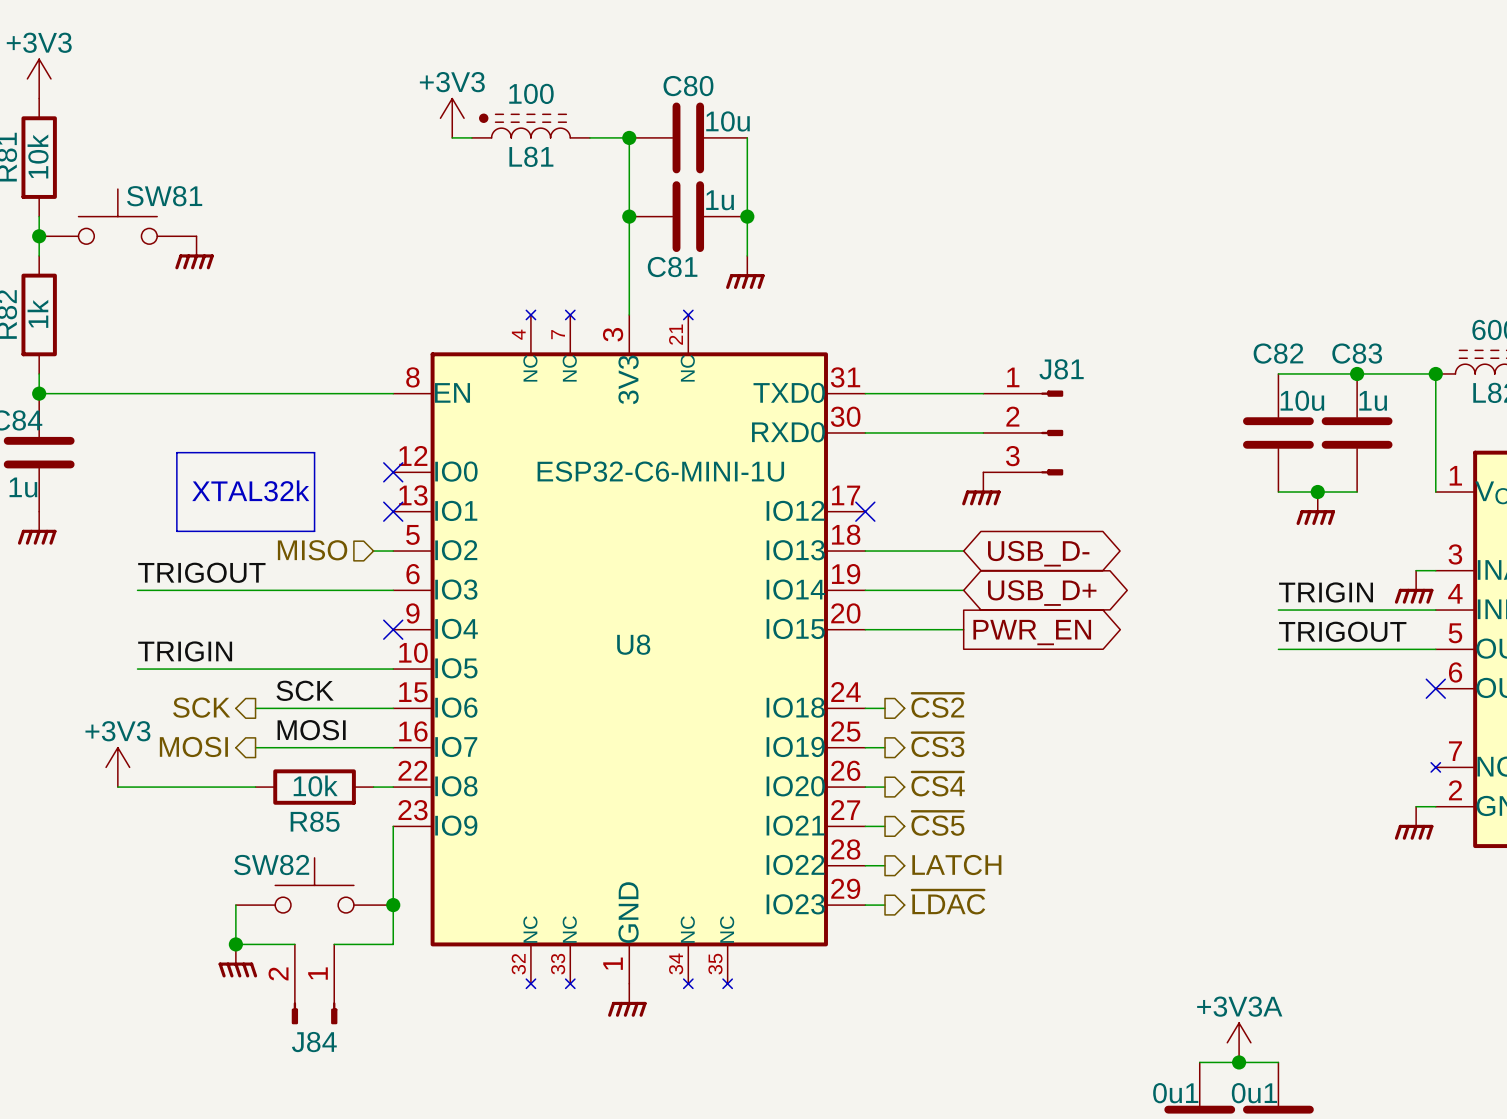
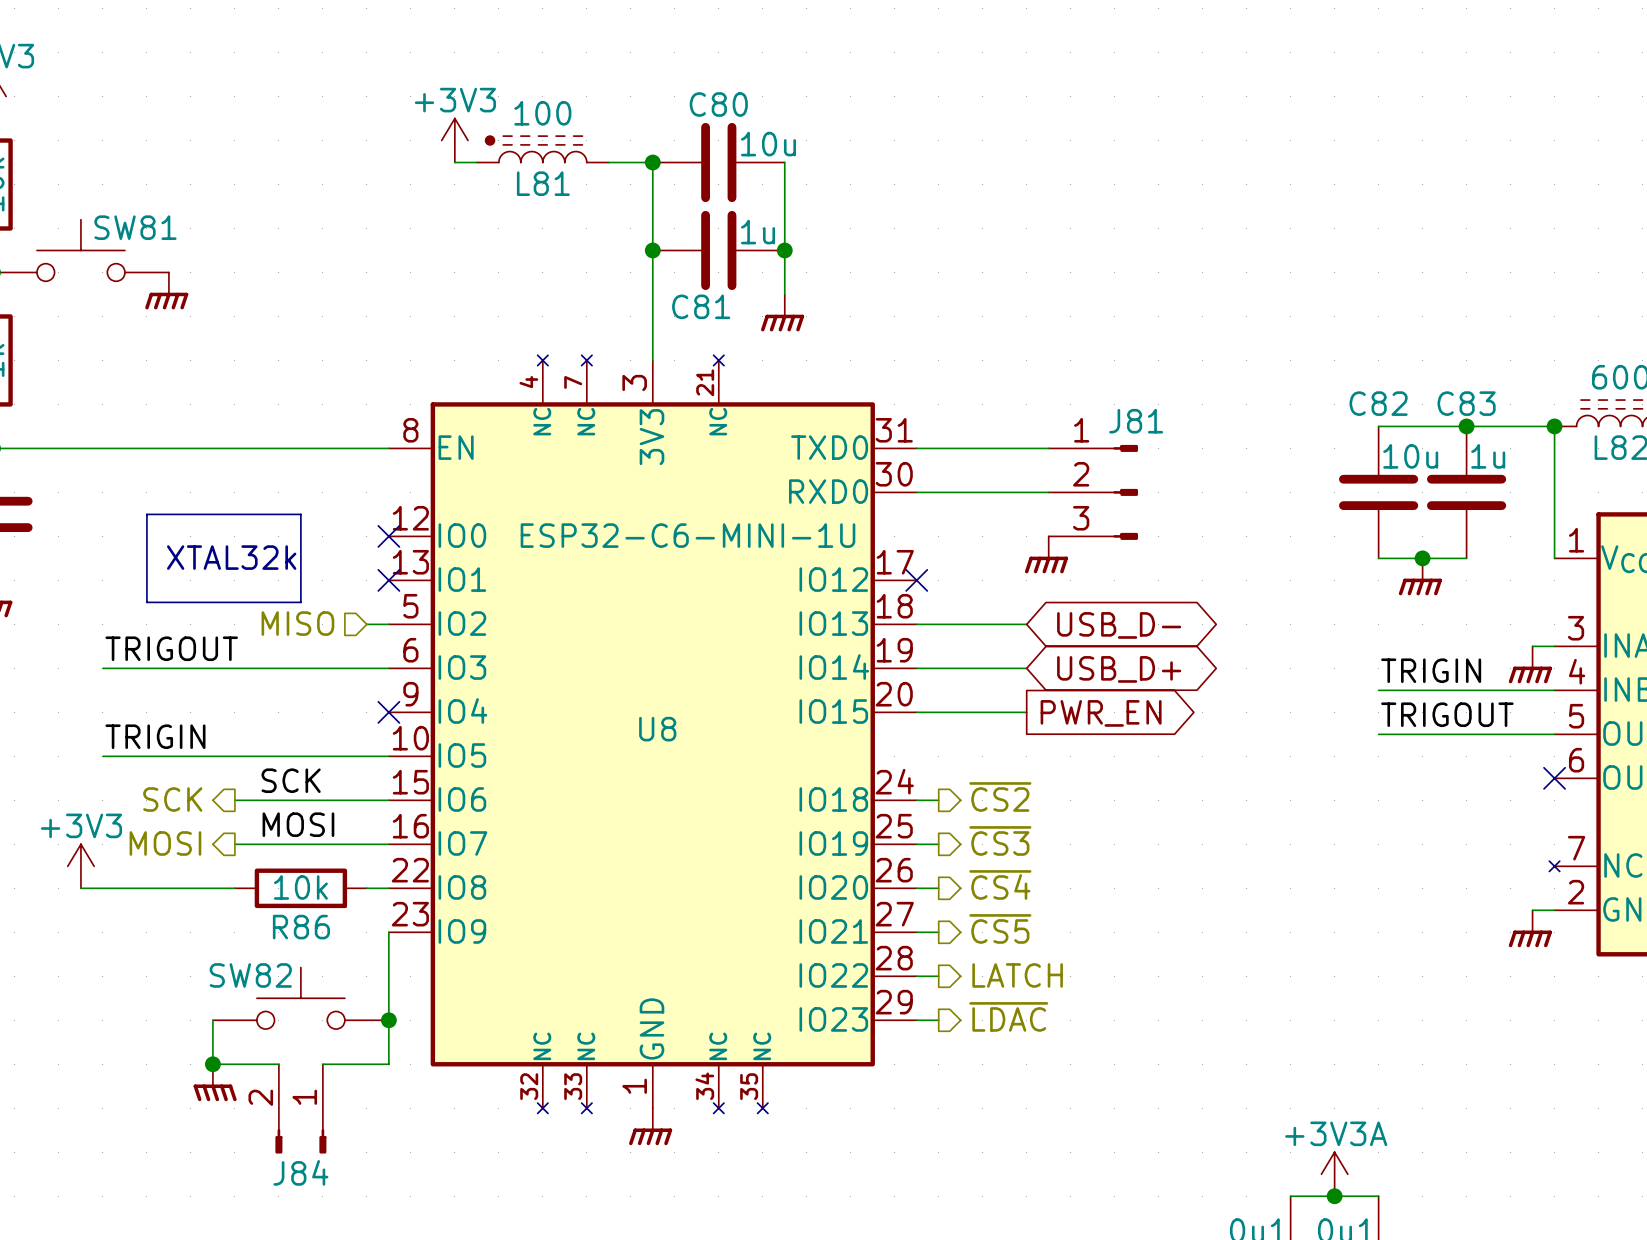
R85 name: R85 (315, 821) -> R86 (301, 927)

